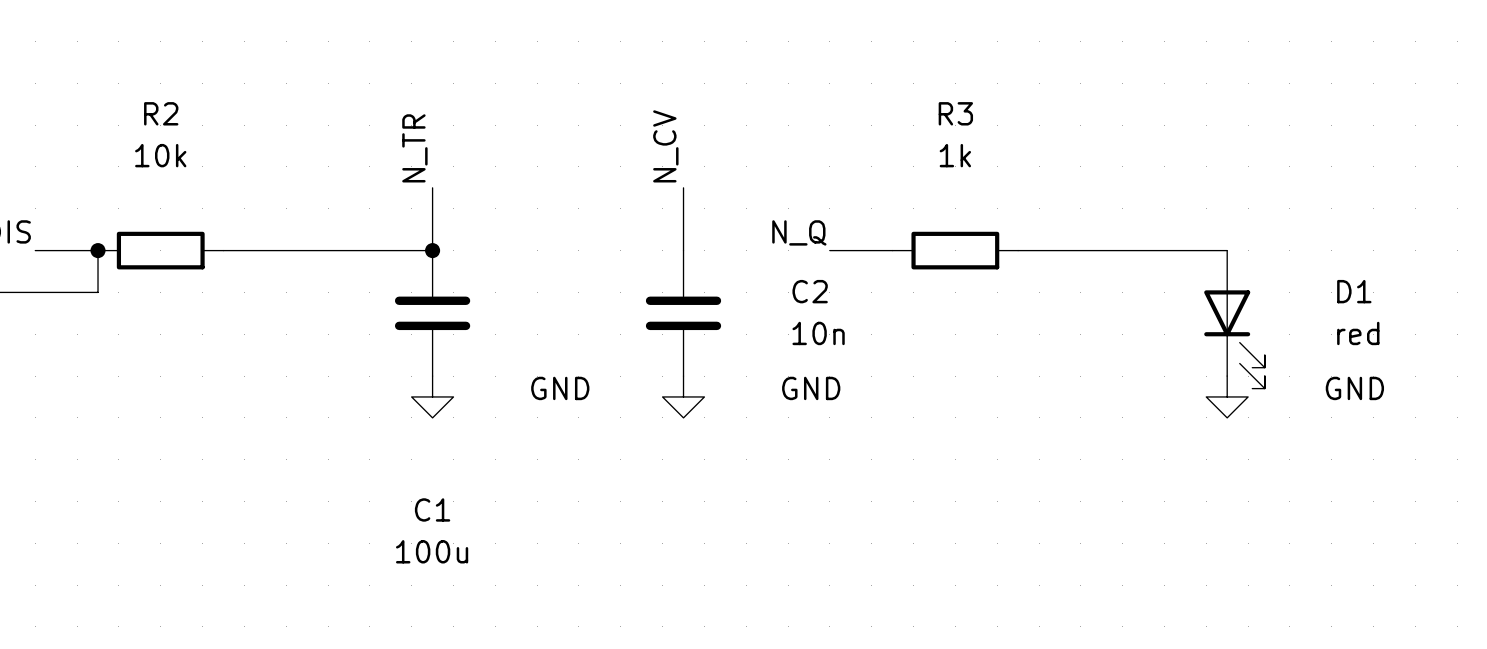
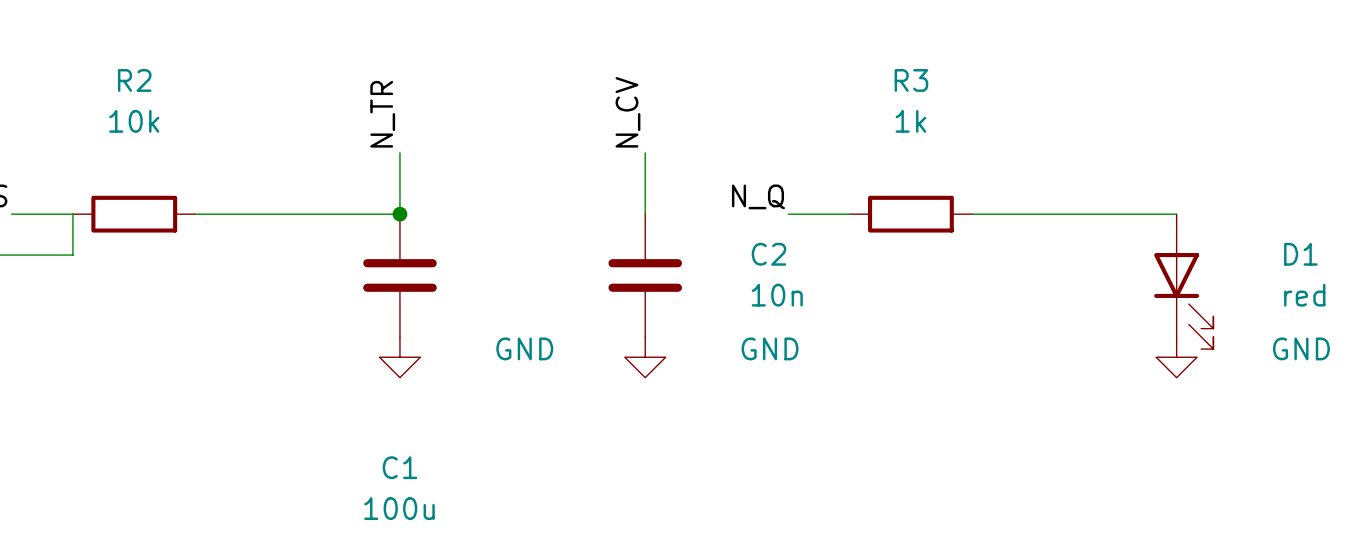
junction: (98, 250) -> none

